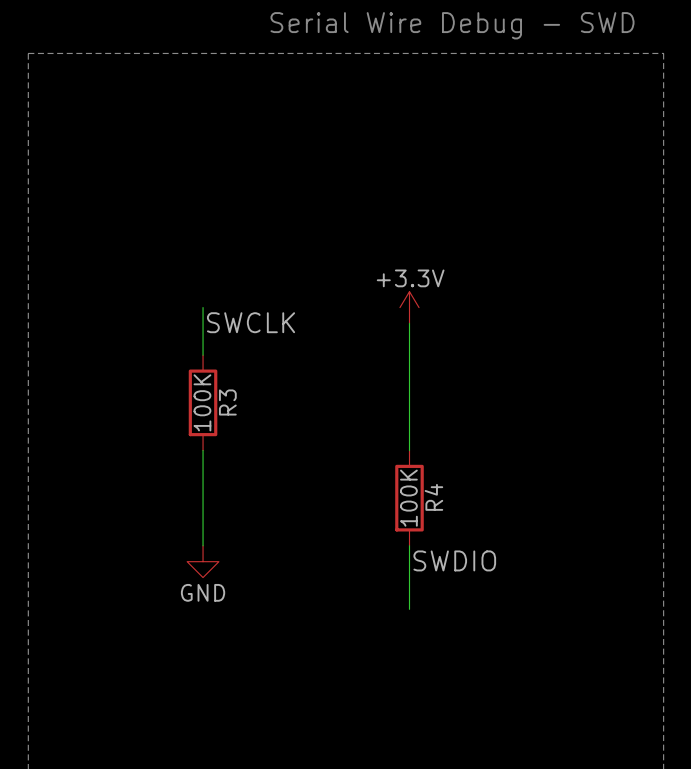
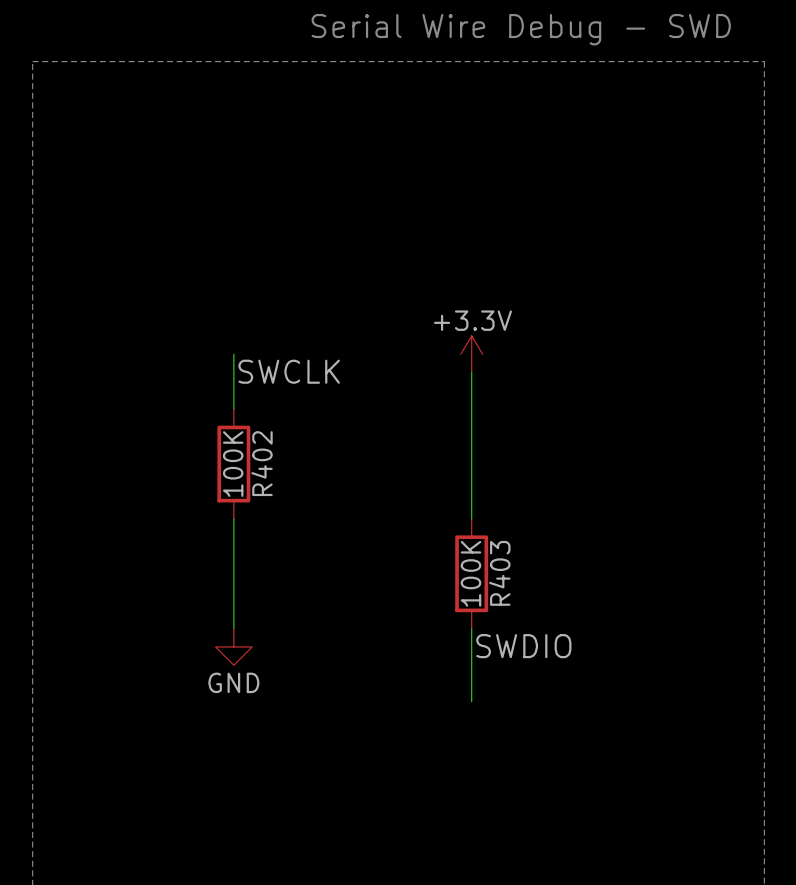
R3 name: R3 (227, 402) -> R402 (262, 463)
R4 name: R4 (433, 497) -> R403 (499, 573)

